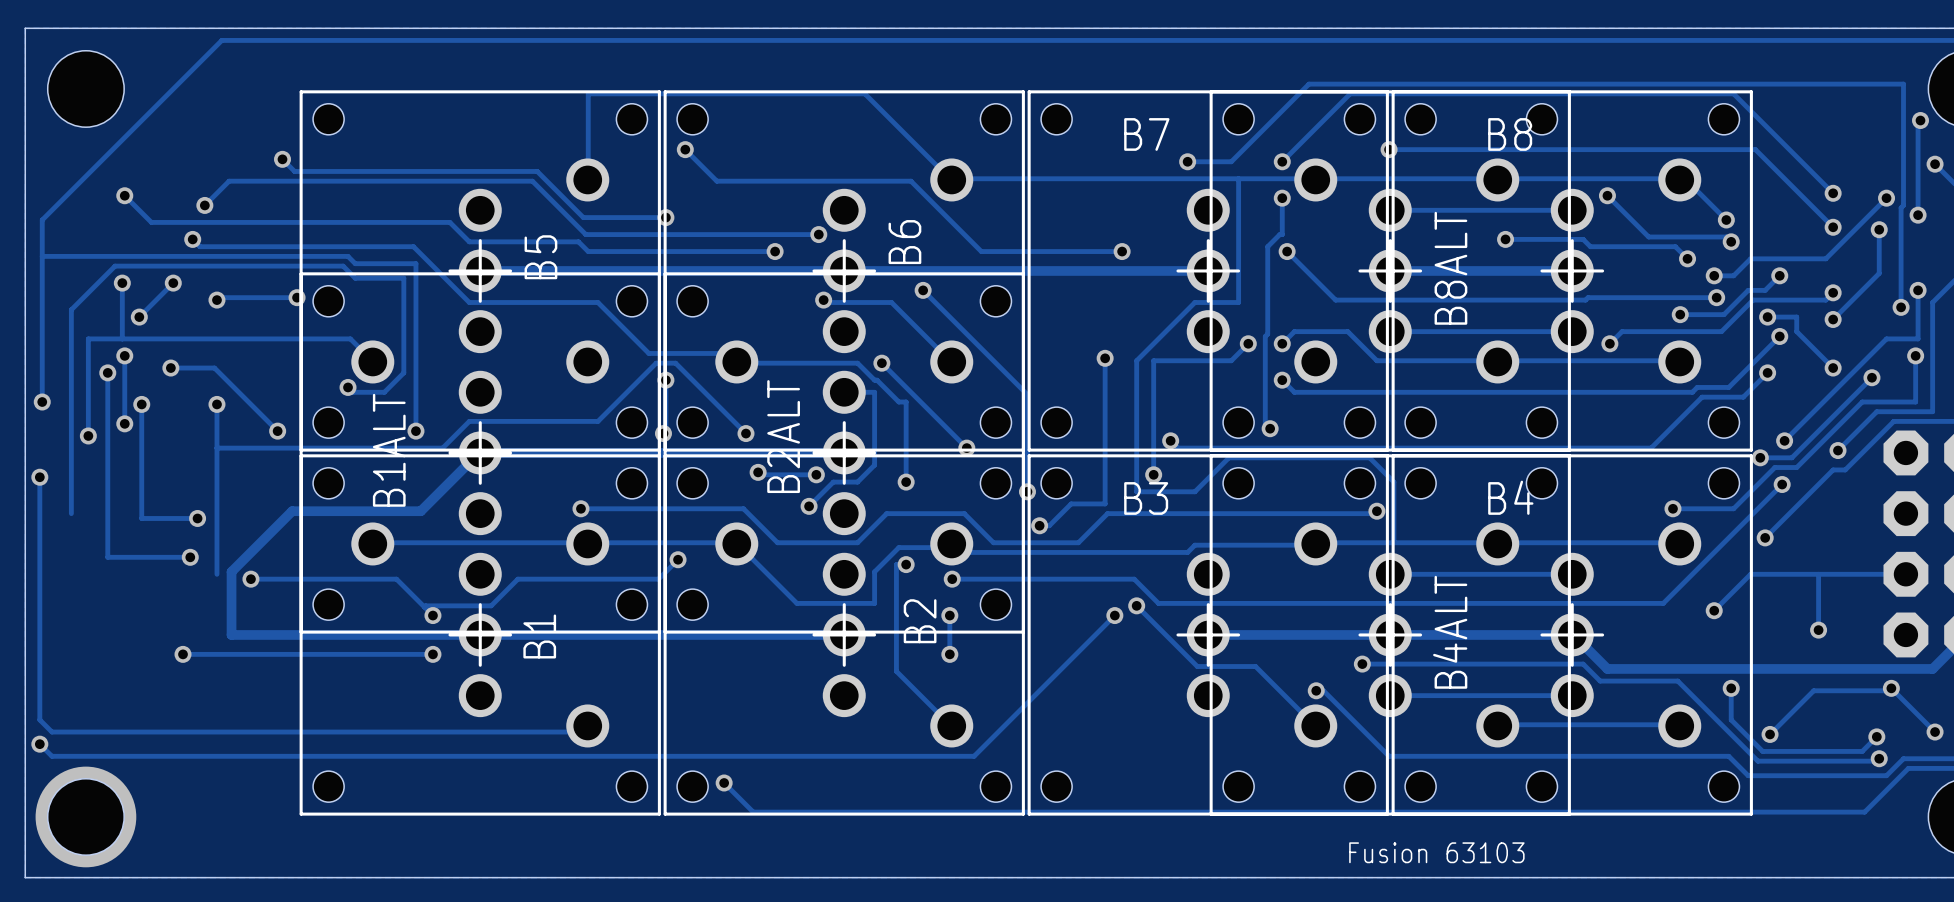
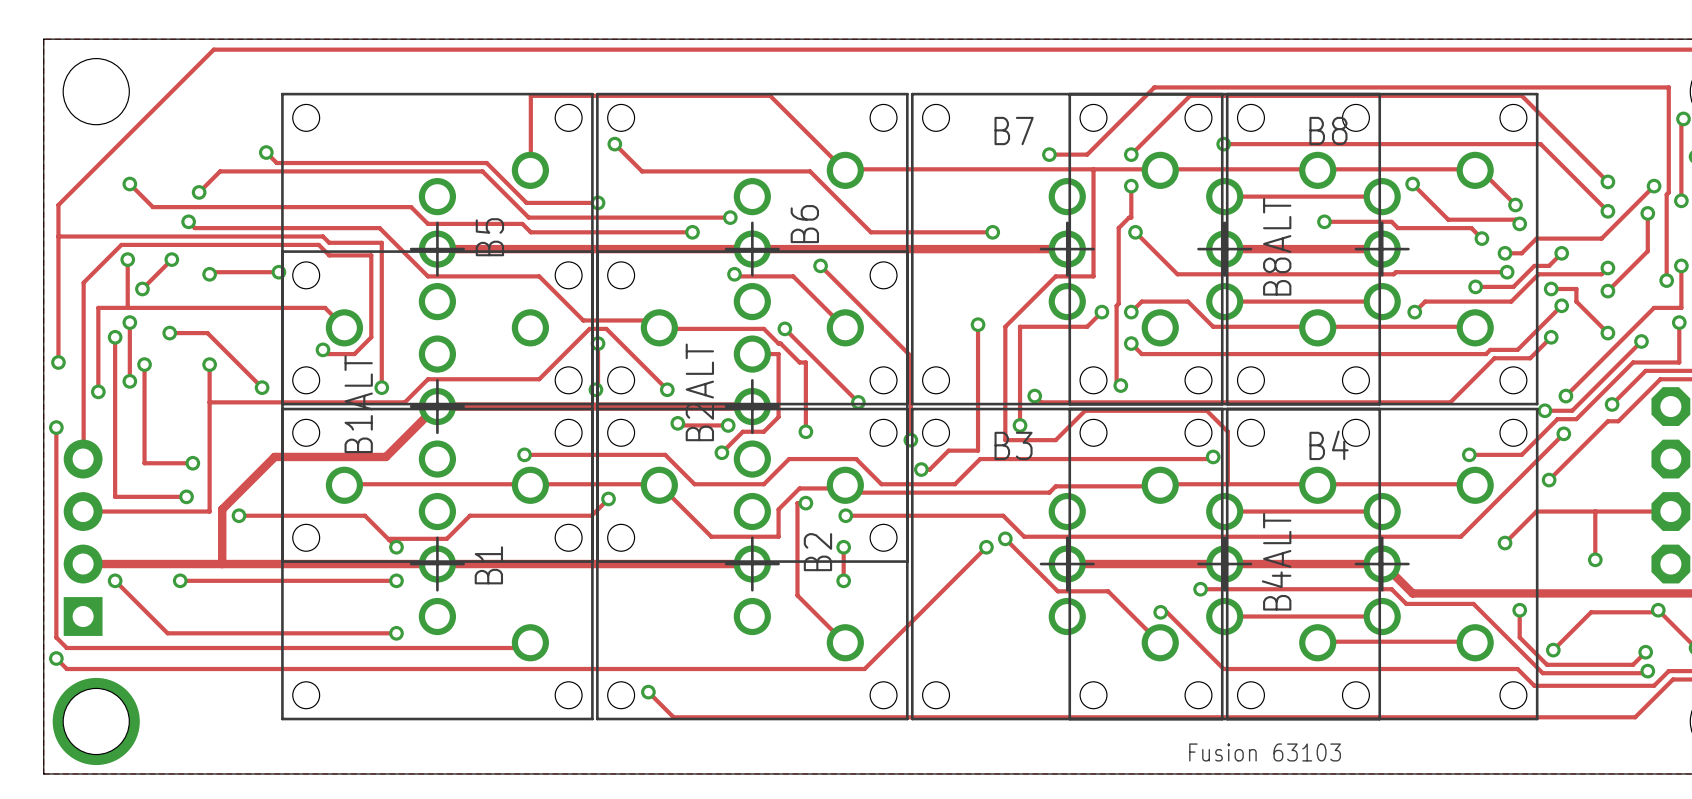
track: none -> (83, 511) (209, 511)
part: none -> (83, 537)
track: none -> (83, 564) (222, 564)
track: none -> (115, 580) (167, 633) (396, 633)
via: none -> (115, 580)
via: none -> (396, 633)

